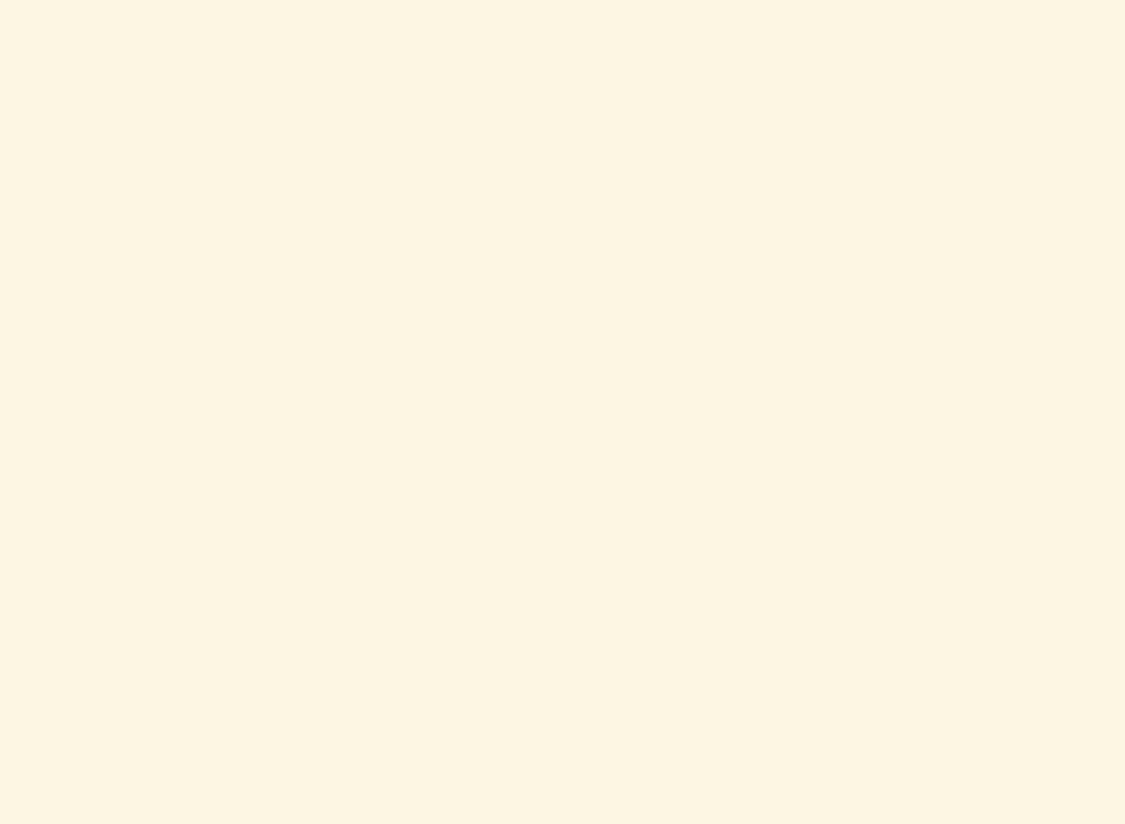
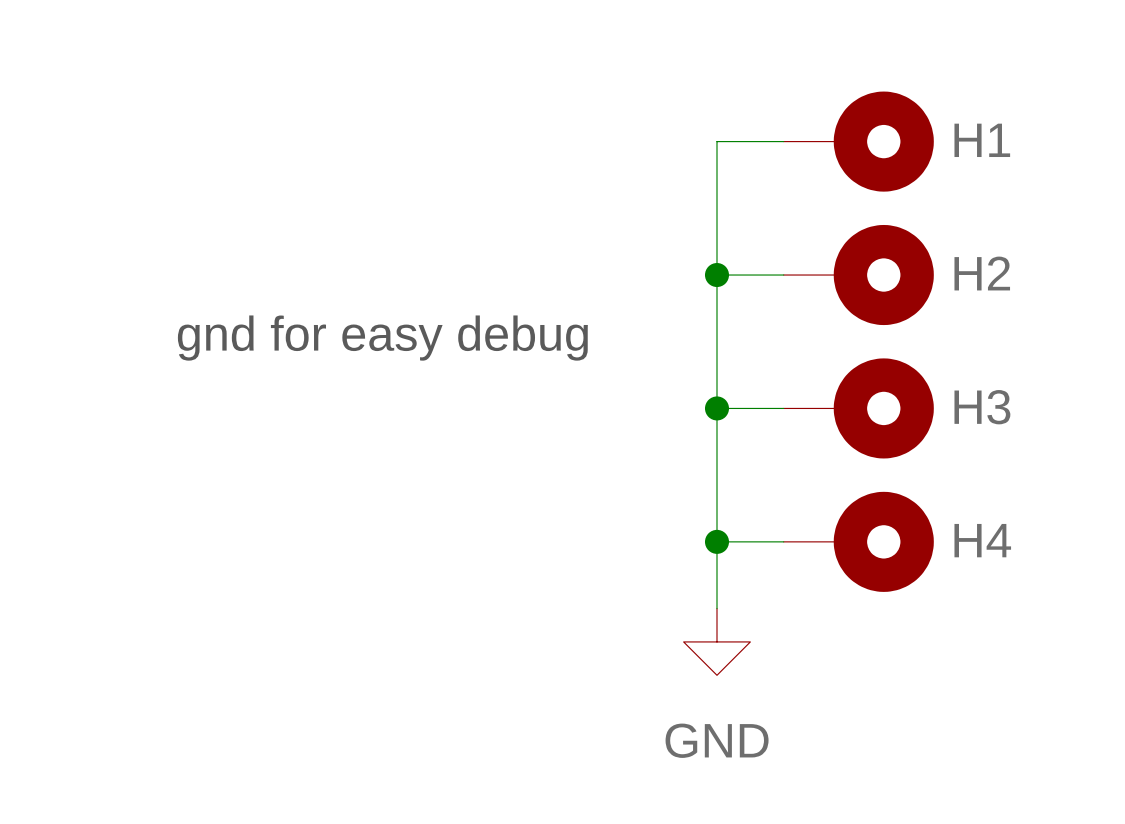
wire: none -> (783, 141) (716, 141) (716, 608)
H1: none -> (858, 141)
wire: none -> (716, 275) (783, 275)
junction: none -> (716, 275)
H2: none -> (858, 275)
text: none -> gnd for easy debug (382, 338)
wire: none -> (716, 408) (783, 408)
junction: none -> (716, 408)
H3: none -> (858, 408)
wire: none -> (716, 541) (783, 541)
junction: none -> (716, 541)
H4: none -> (858, 541)
power symbol: none -> GND (716, 641)

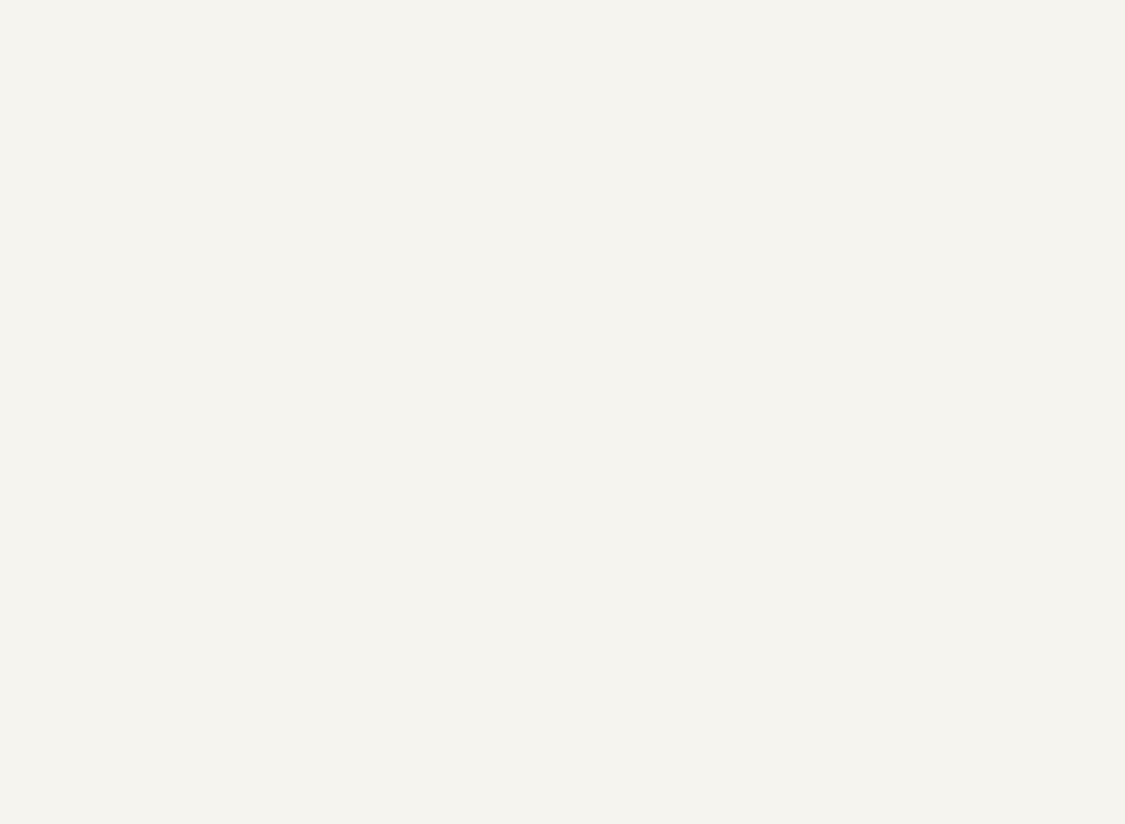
wire: (783, 141) (716, 141) (716, 608) -> none
H1: (858, 141) -> none
wire: (716, 275) (783, 275) -> none
junction: (716, 275) -> none
H2: (858, 275) -> none
text: gnd for easy debug (382, 338) -> none
wire: (716, 408) (783, 408) -> none
junction: (716, 408) -> none
H3: (858, 408) -> none
wire: (716, 541) (783, 541) -> none
junction: (716, 541) -> none
H4: (858, 541) -> none
power symbol: GND (716, 641) -> none

